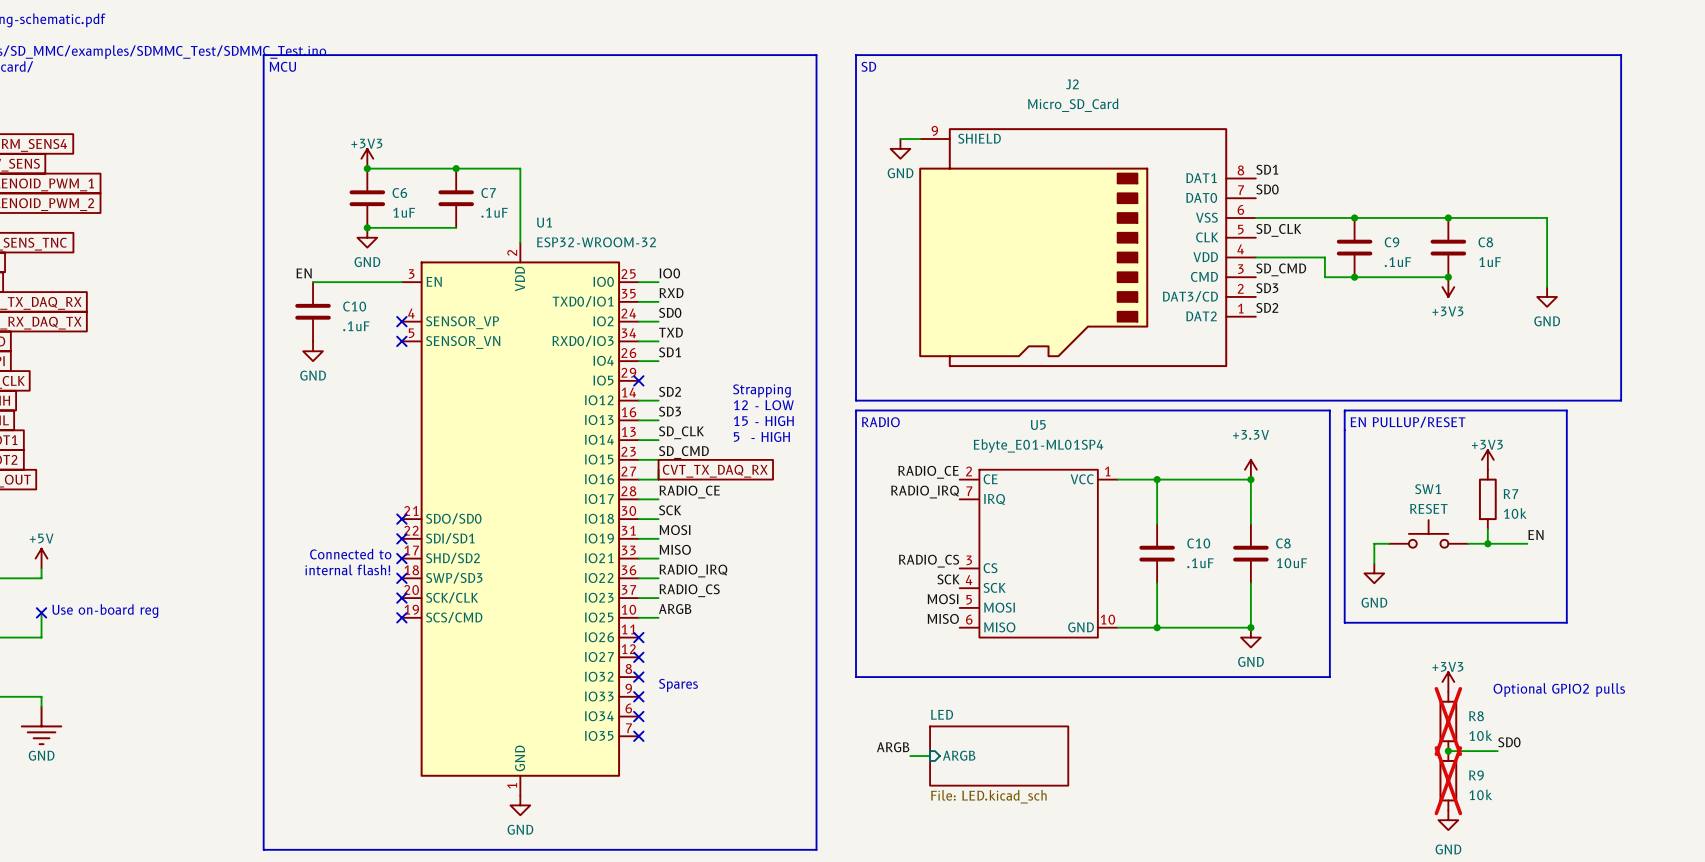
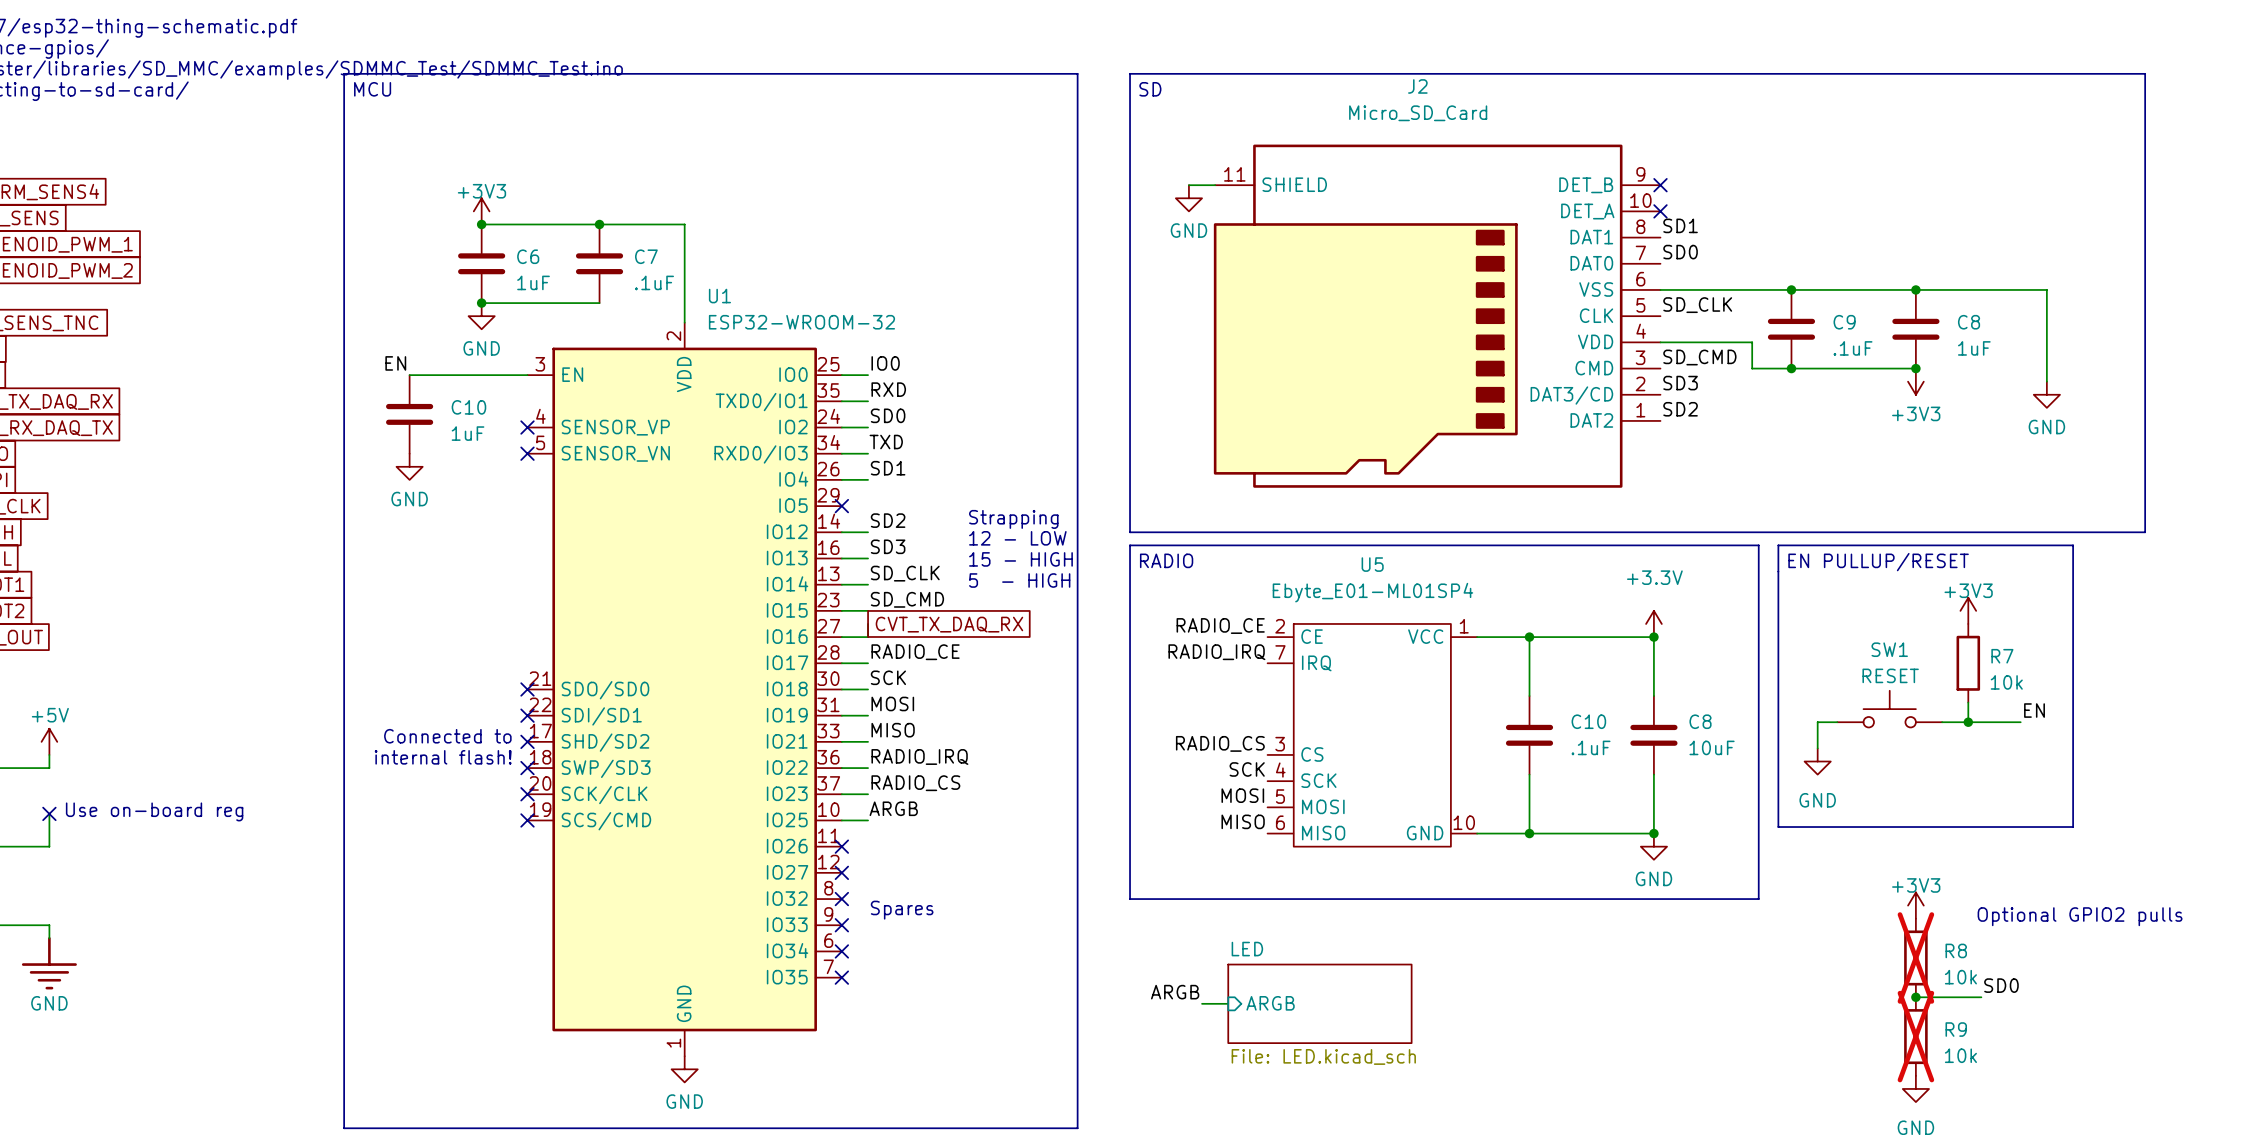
J2 symbol: [919, 128, 1256, 368] -> [1213, 144, 1661, 488]
no-connect mark: none -> (1660, 185)
no-connect mark: none -> (1660, 211)
C10 value: .1uF (356, 326) -> 1uF (468, 433)

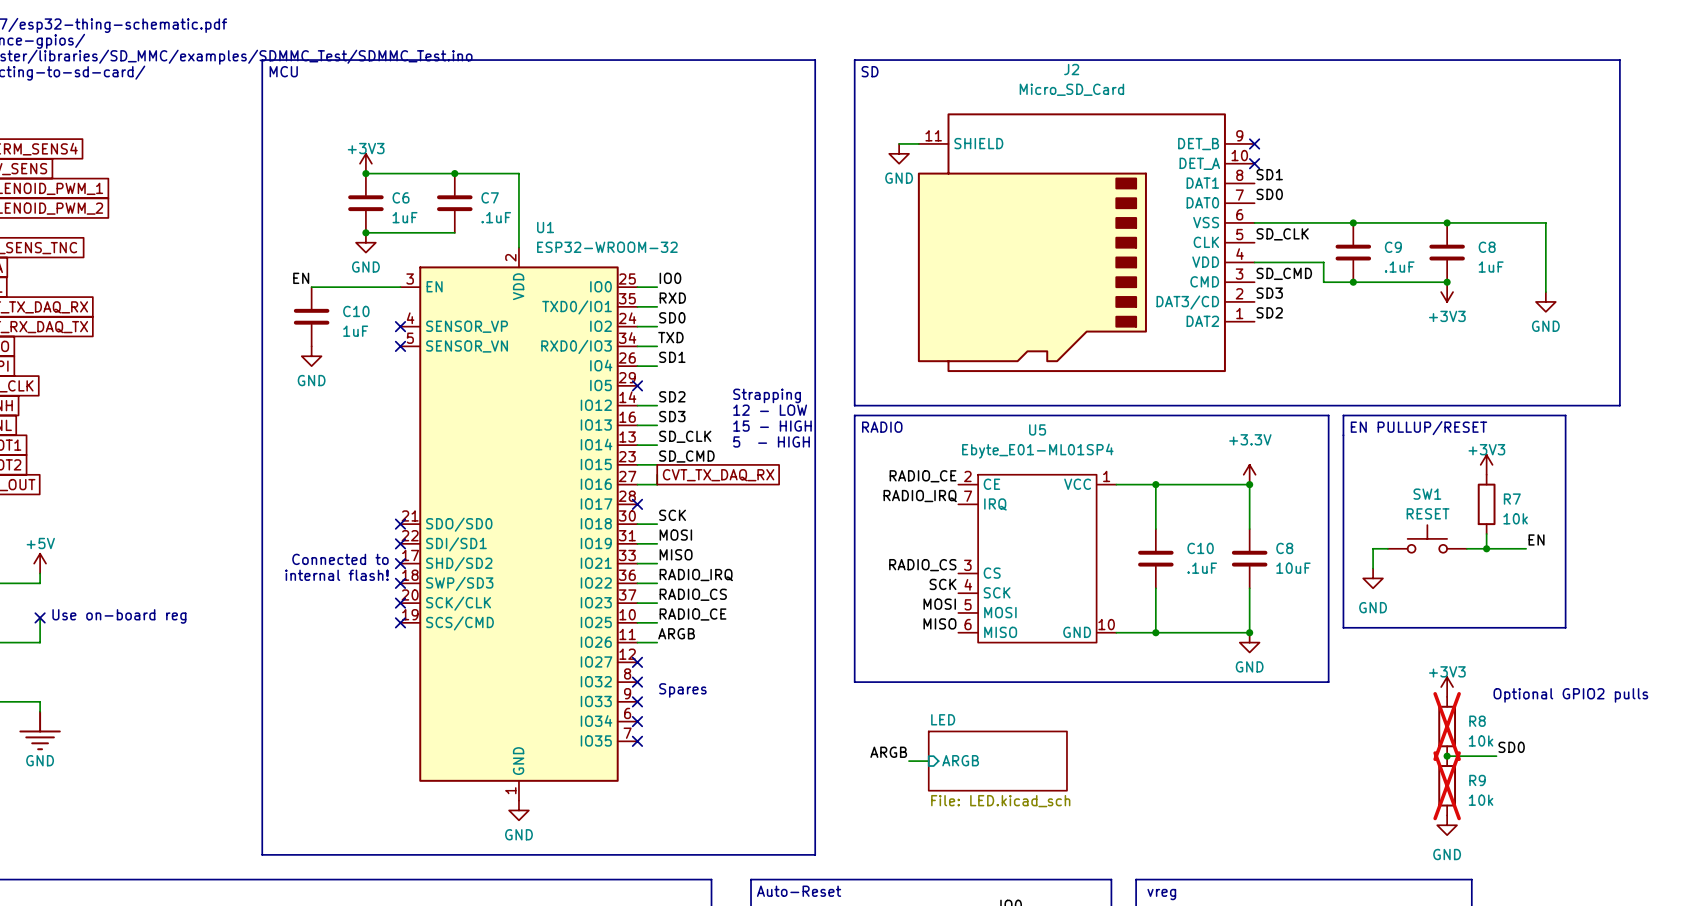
label: RADIO_CE (915, 652) -> none
wire: (841, 663) (868, 663) -> (637, 642) (657, 642)
no-connect mark: none -> (637, 504)
label: ARGB (893, 808) -> RADIO_CE (693, 614)
label: none -> ARGB (676, 633)
no-connect mark: (841, 846) -> none

